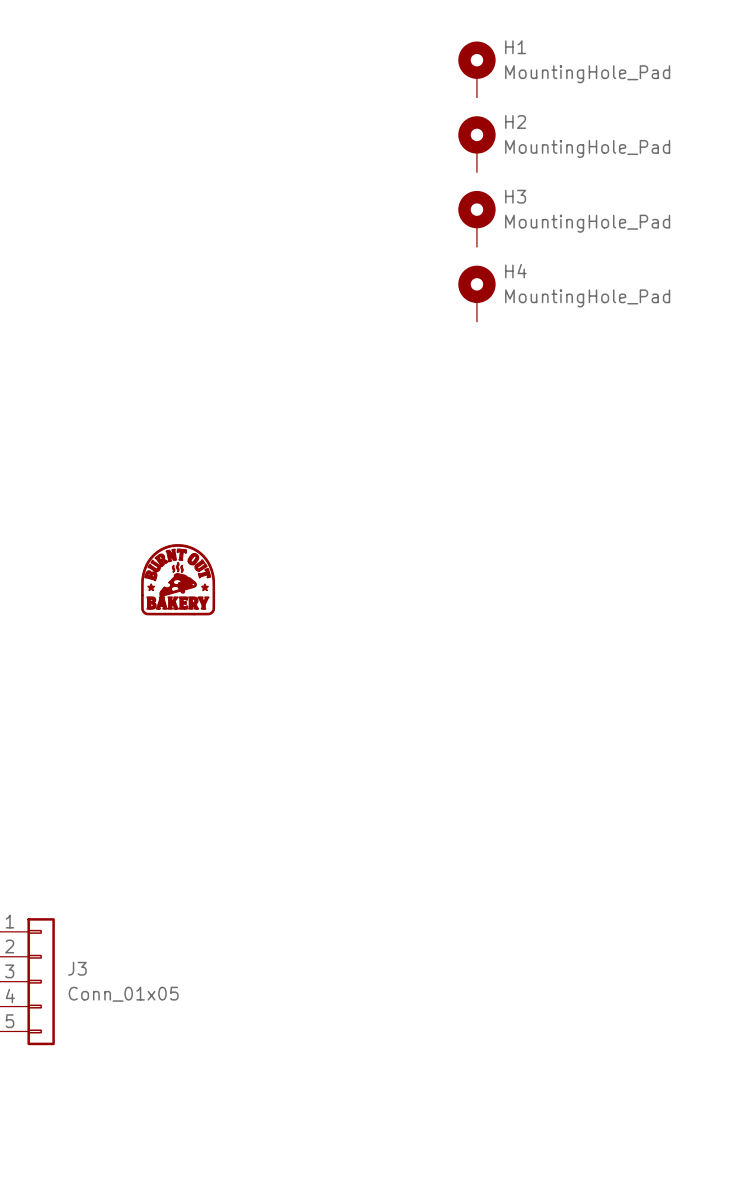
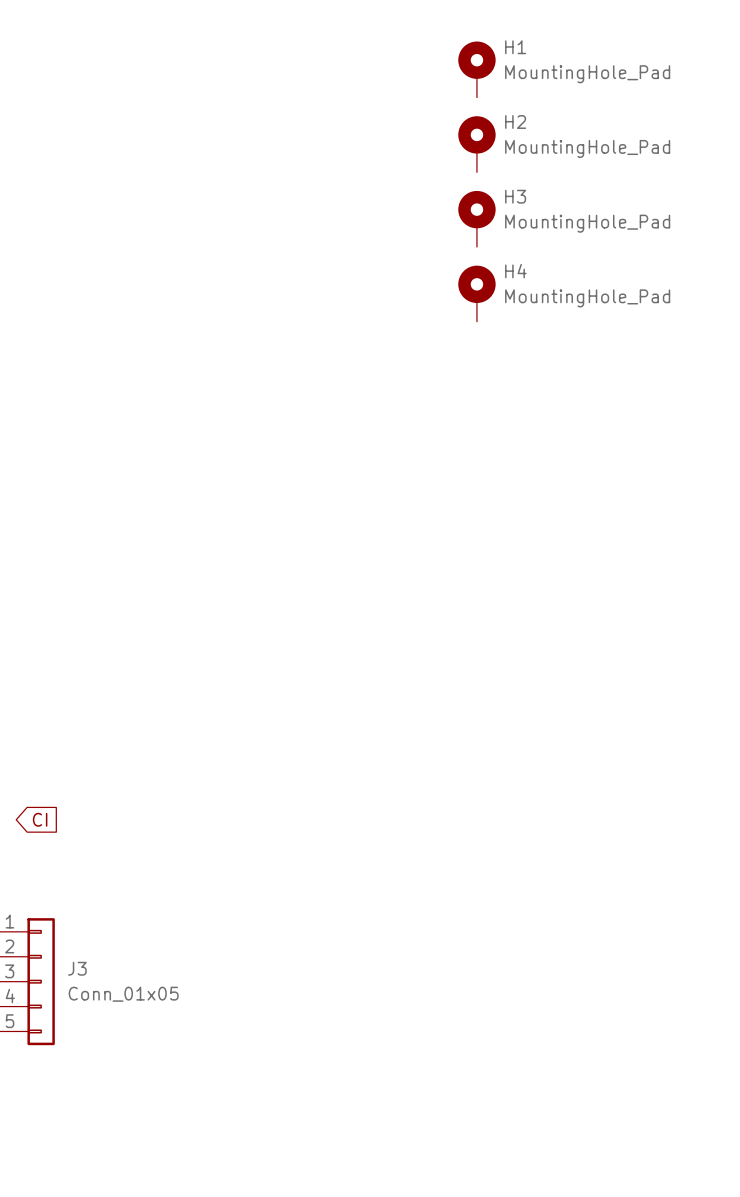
part: (178, 579) -> none
global label: none -> CI (40, 819)

